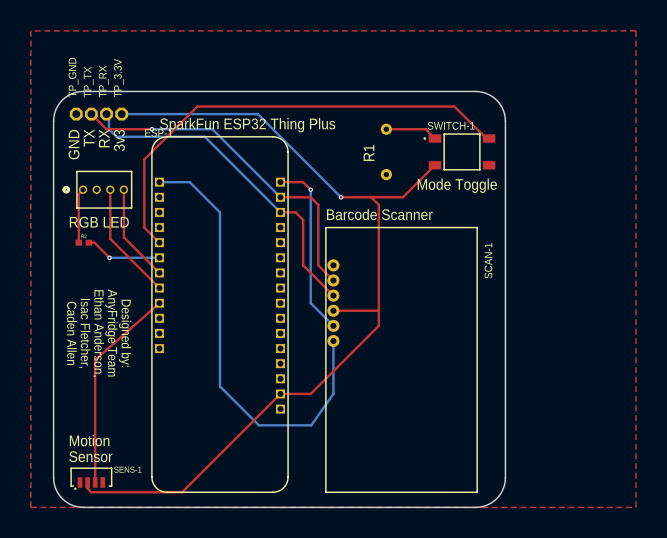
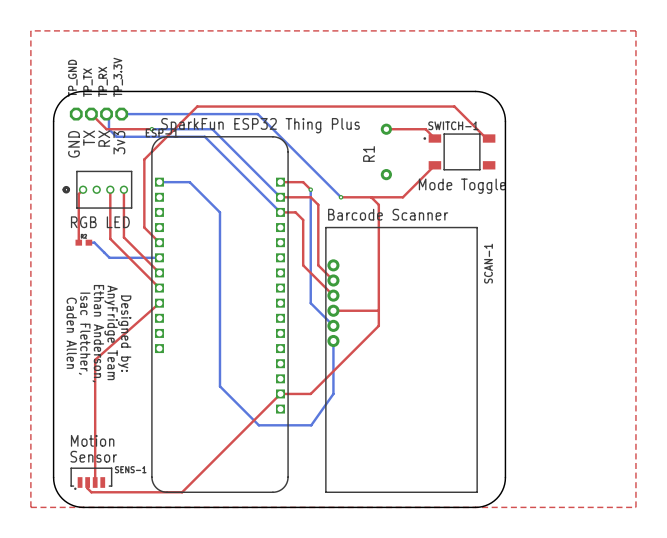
top track: (88, 242) (94, 242) (109, 257) -> none
bottom track: none -> (91, 242) (94, 242) (109, 257)
via: (109, 257) -> none

